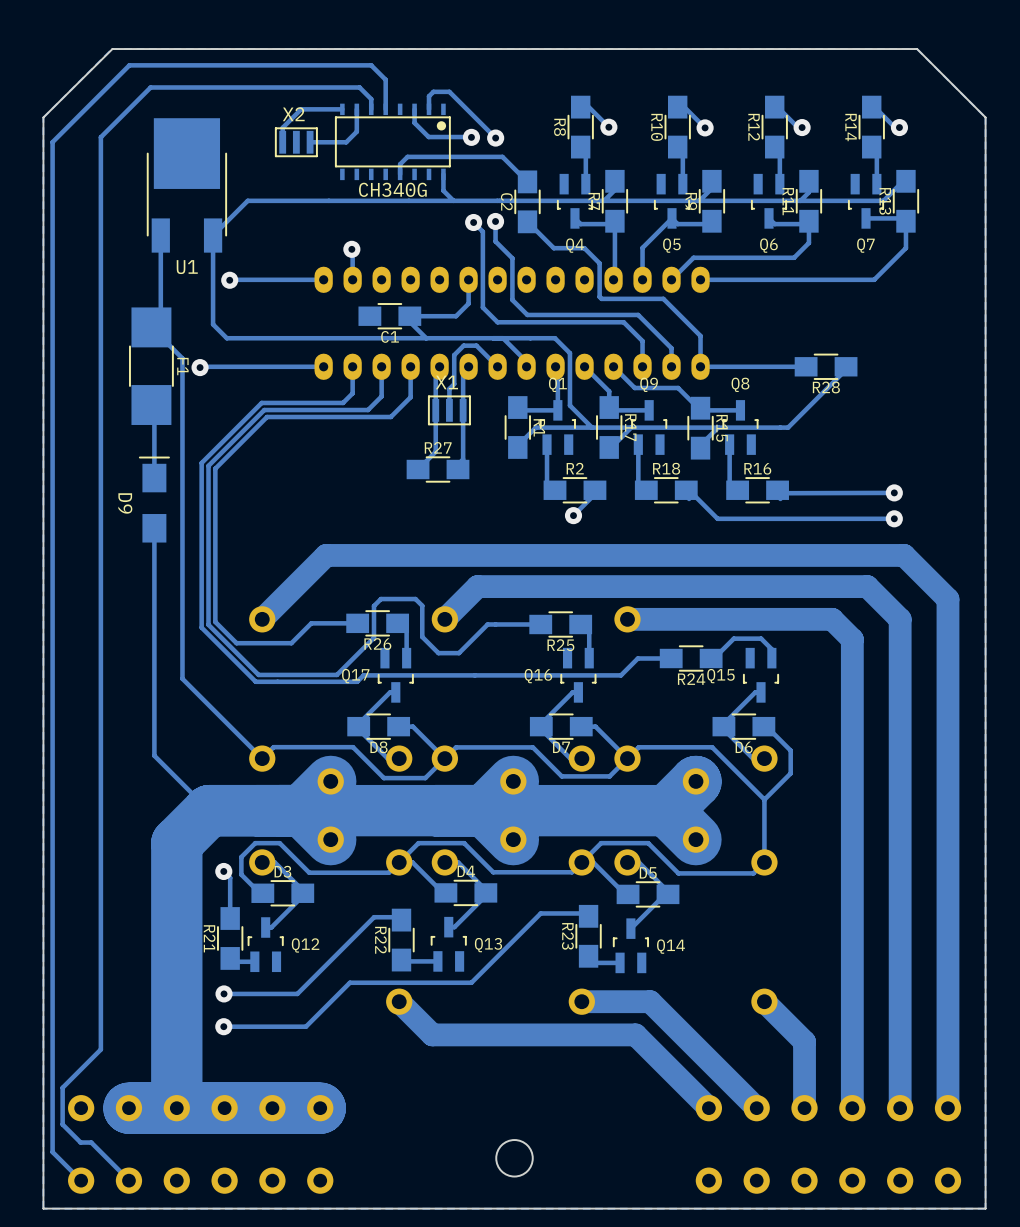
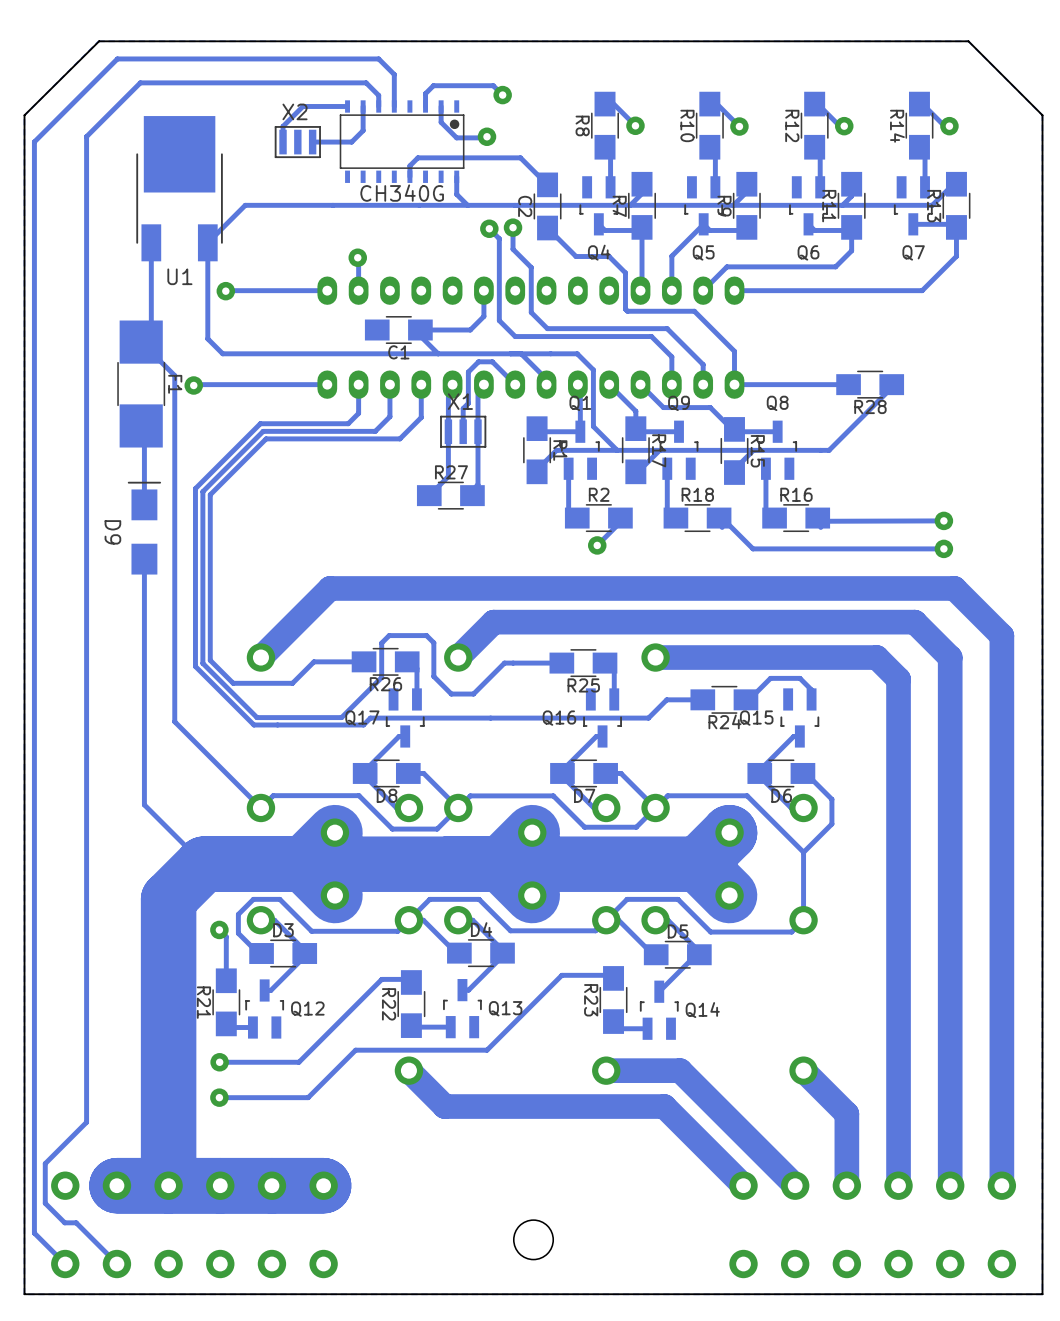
track: (414, 109) (414, 122) (428, 137) (471, 137) -> (425, 106) (425, 93) (433, 85) (493, 85) (502, 95)
track: (429, 109) (429, 96) (433, 91) (449, 91) (495, 138) -> (441, 106) (441, 122) (456, 137) (487, 137)
via position: (495, 138) -> (502, 95)

